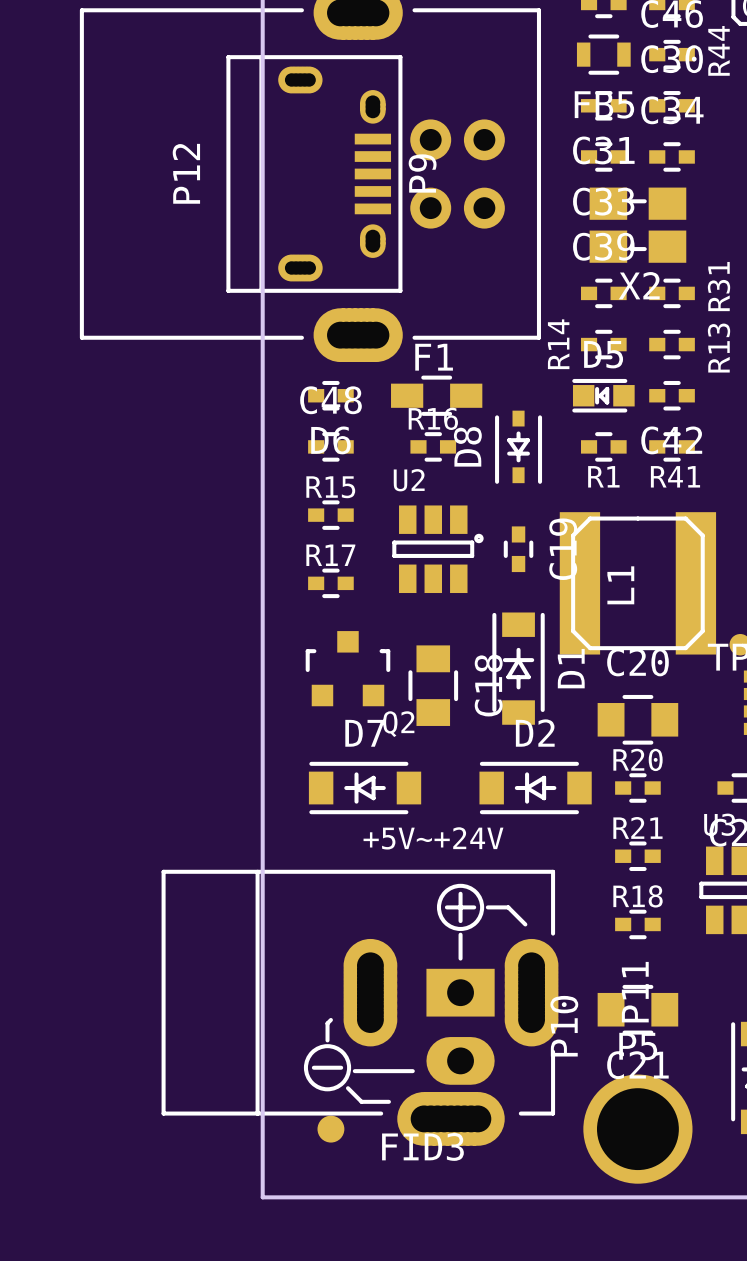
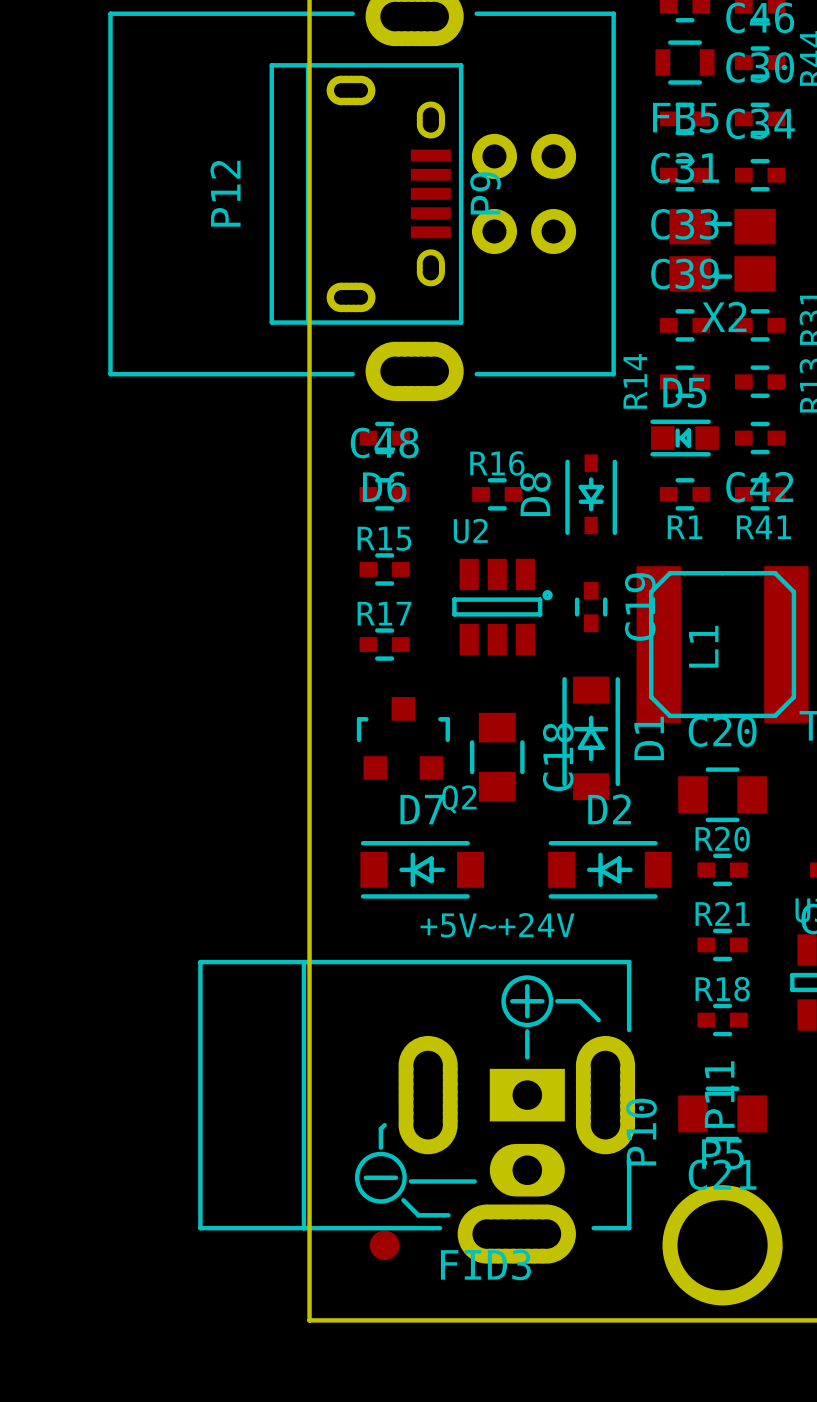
F1: (436, 395) -> none

